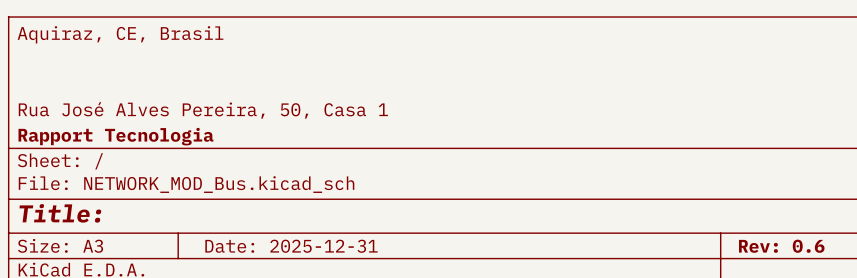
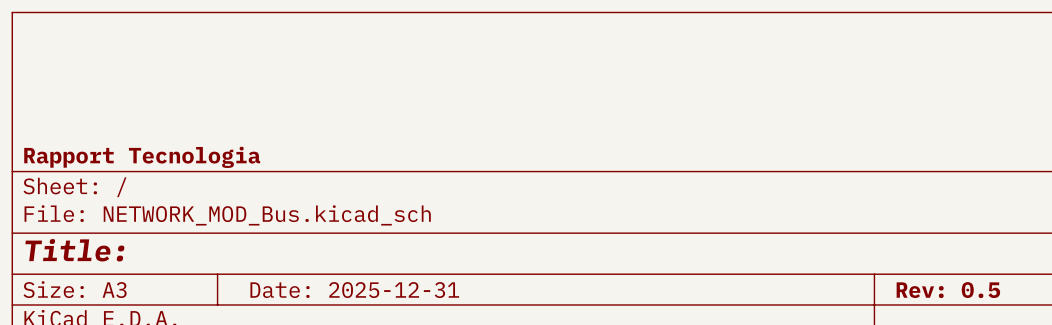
title block: Aquiraz, CE, Brasil (120, 34) -> none
title block: Rua José Alves Pereira, 50, Casa 1 (203, 110) -> none
title block: Rev: 0.6 (781, 246) -> Rev: 0.5 (948, 290)

